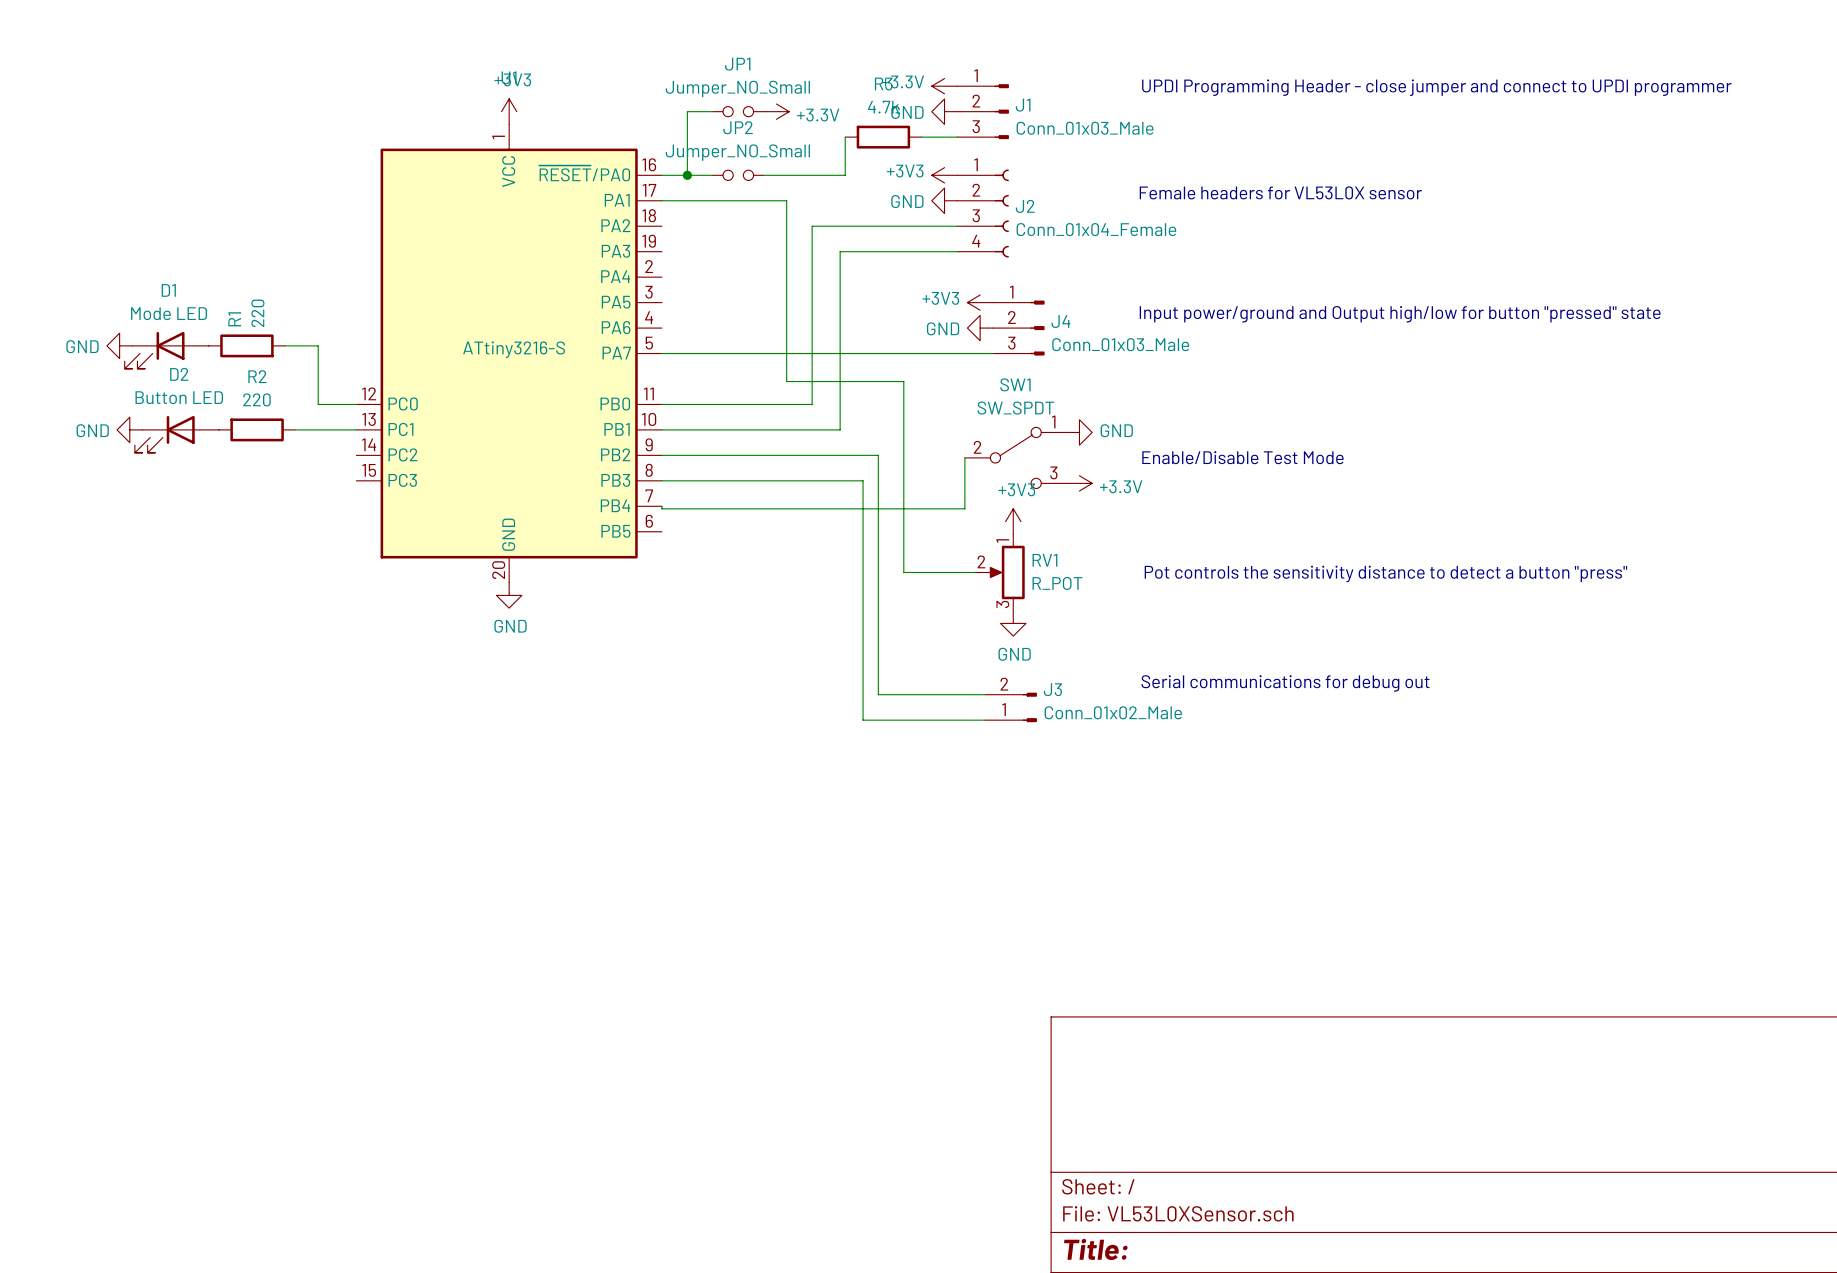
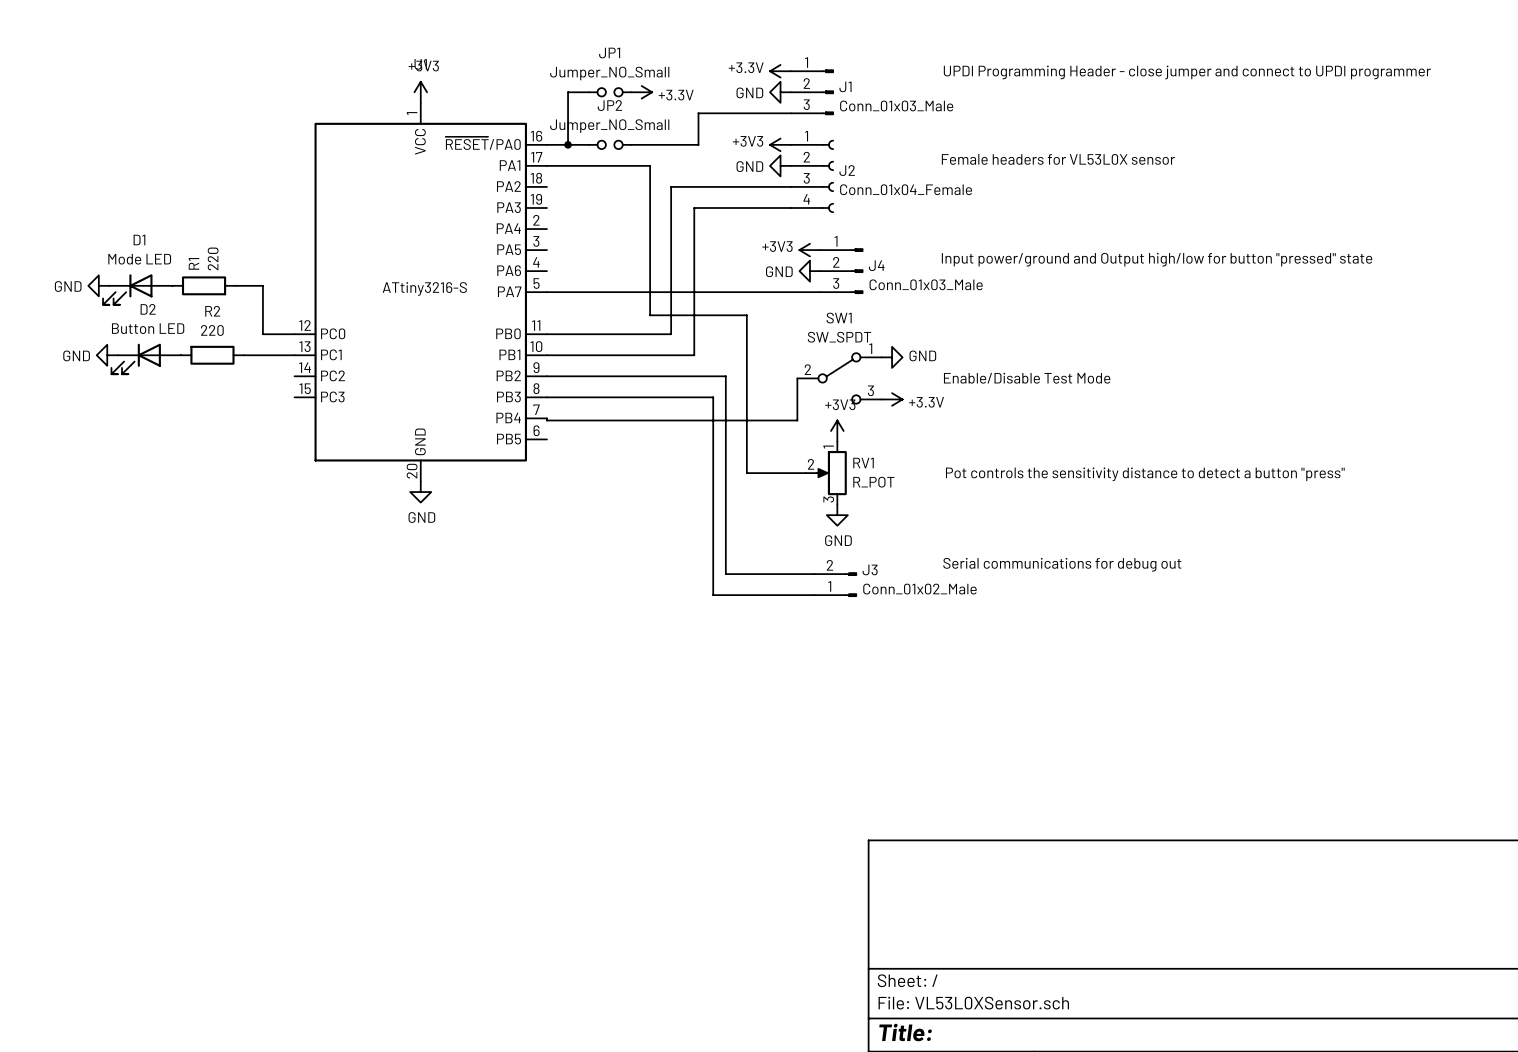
wire: none -> (698, 113) (761, 113)
R3: 4.7k (883, 137) -> none

